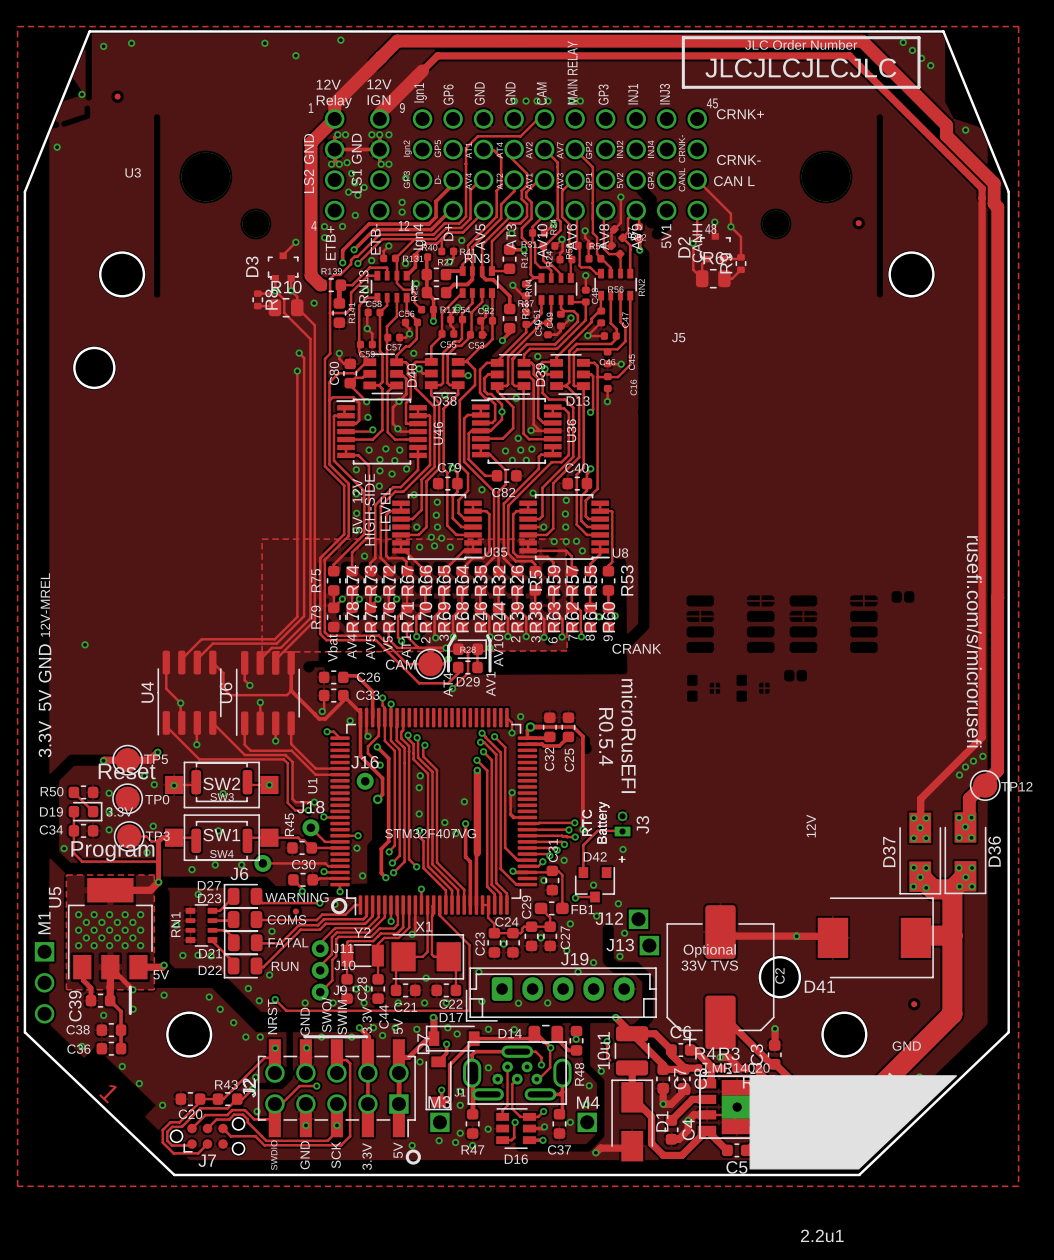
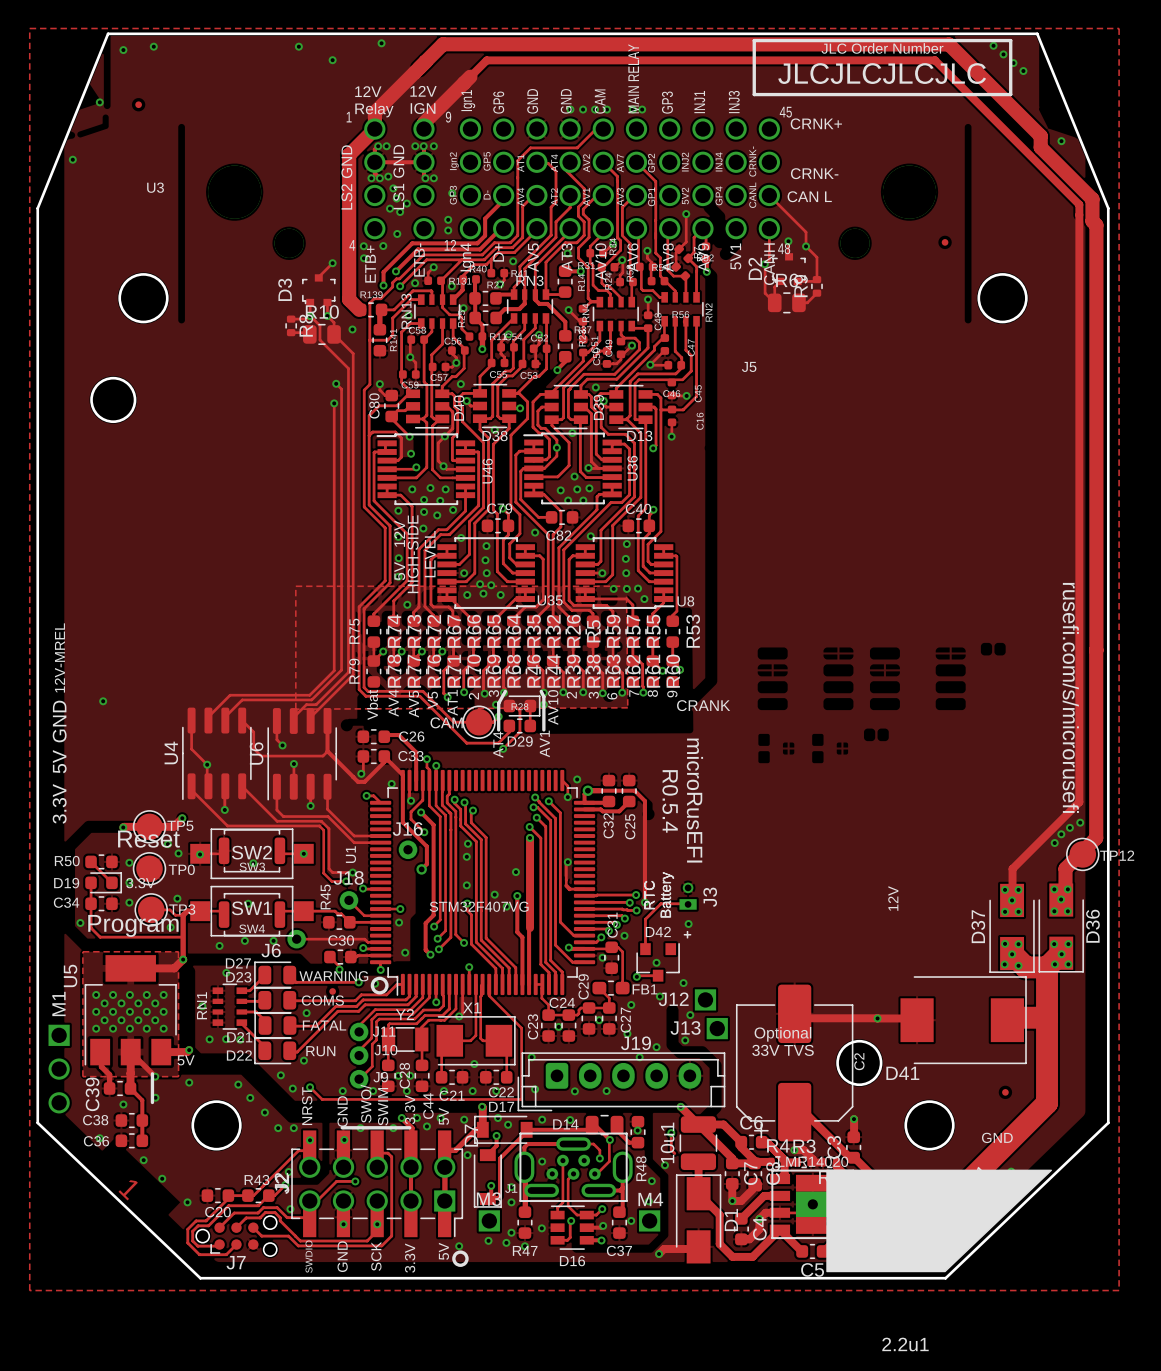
track: (388, 627) (388, 639) (397, 647) (446, 647) -> none
track: (407, 627) (407, 636) (418, 647) -> none

